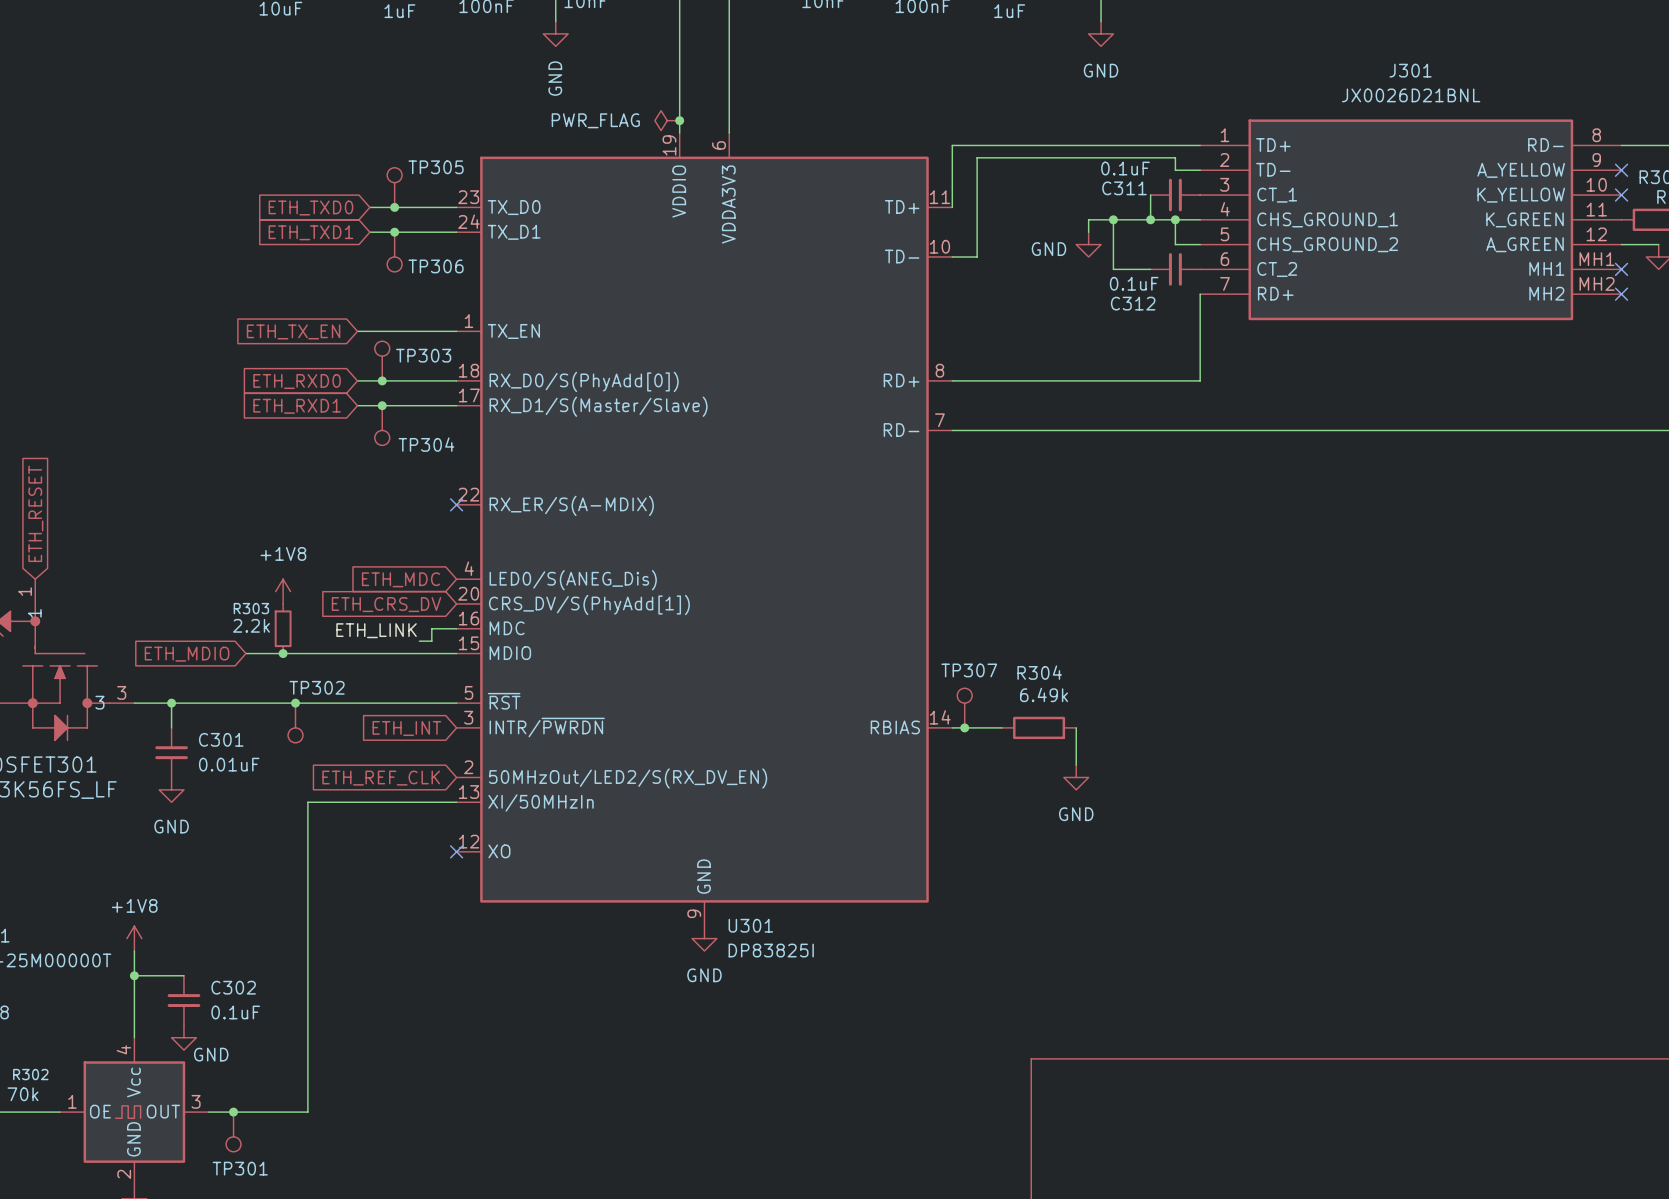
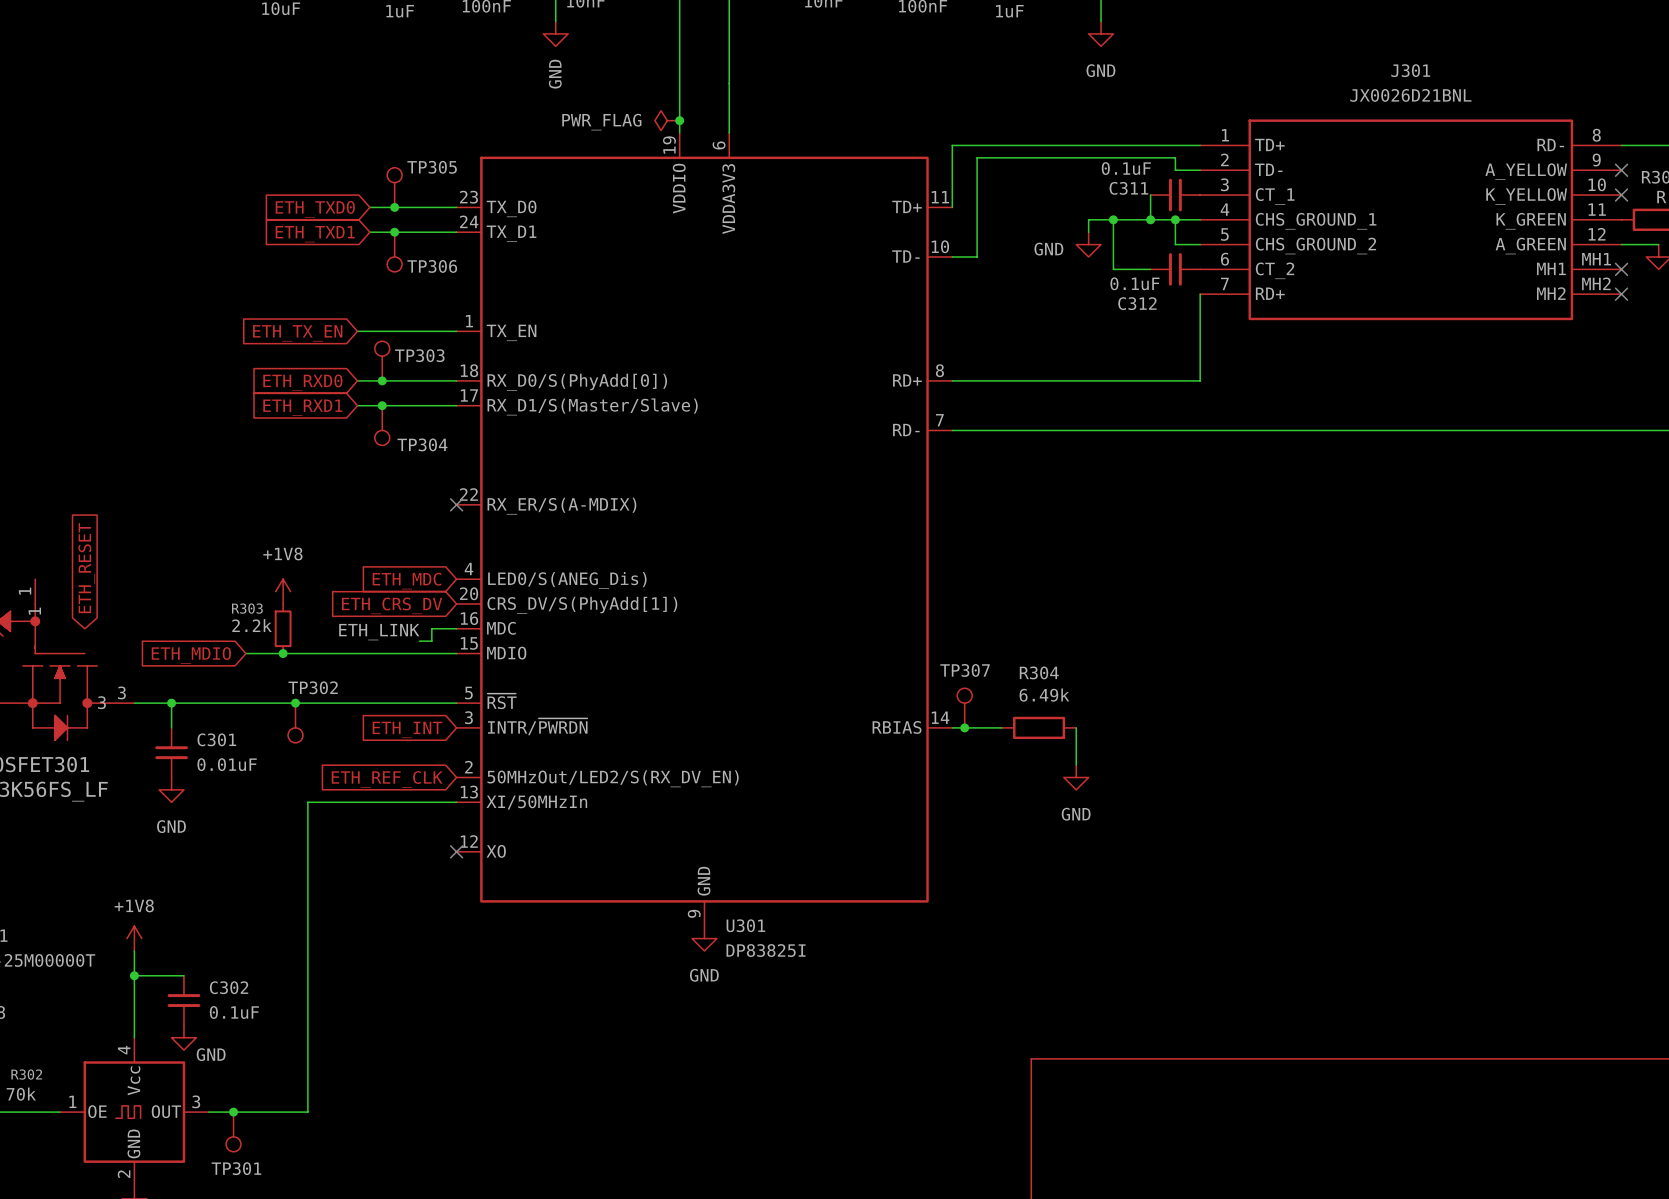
global label position: ETH_RESET (35, 513) -> ETH_RESET (86, 568)

